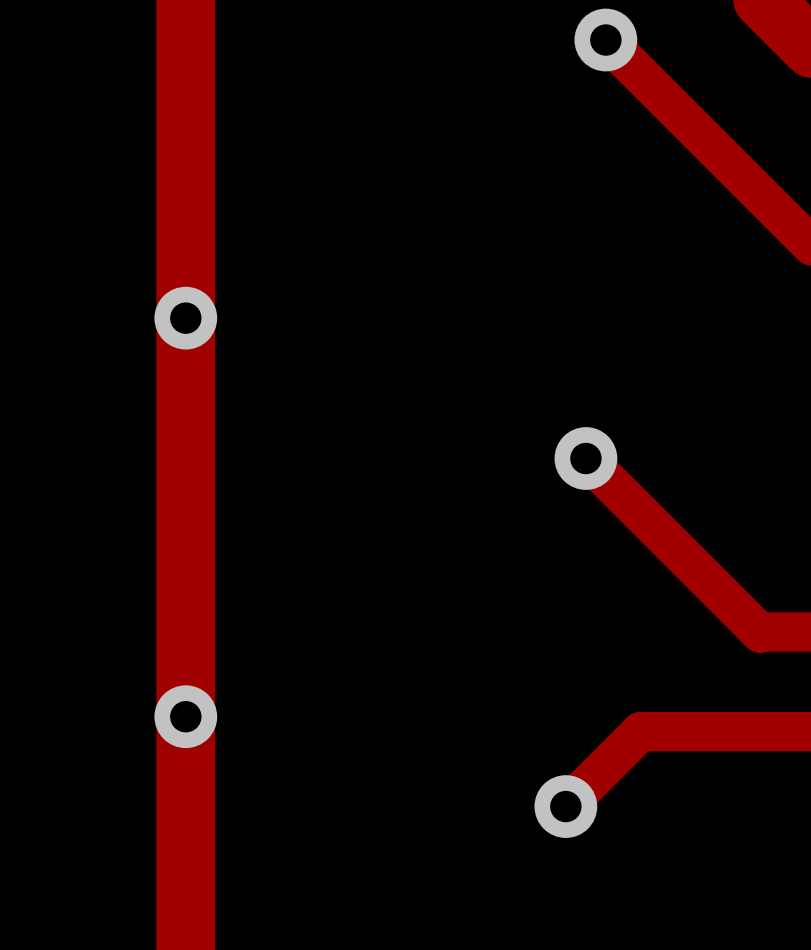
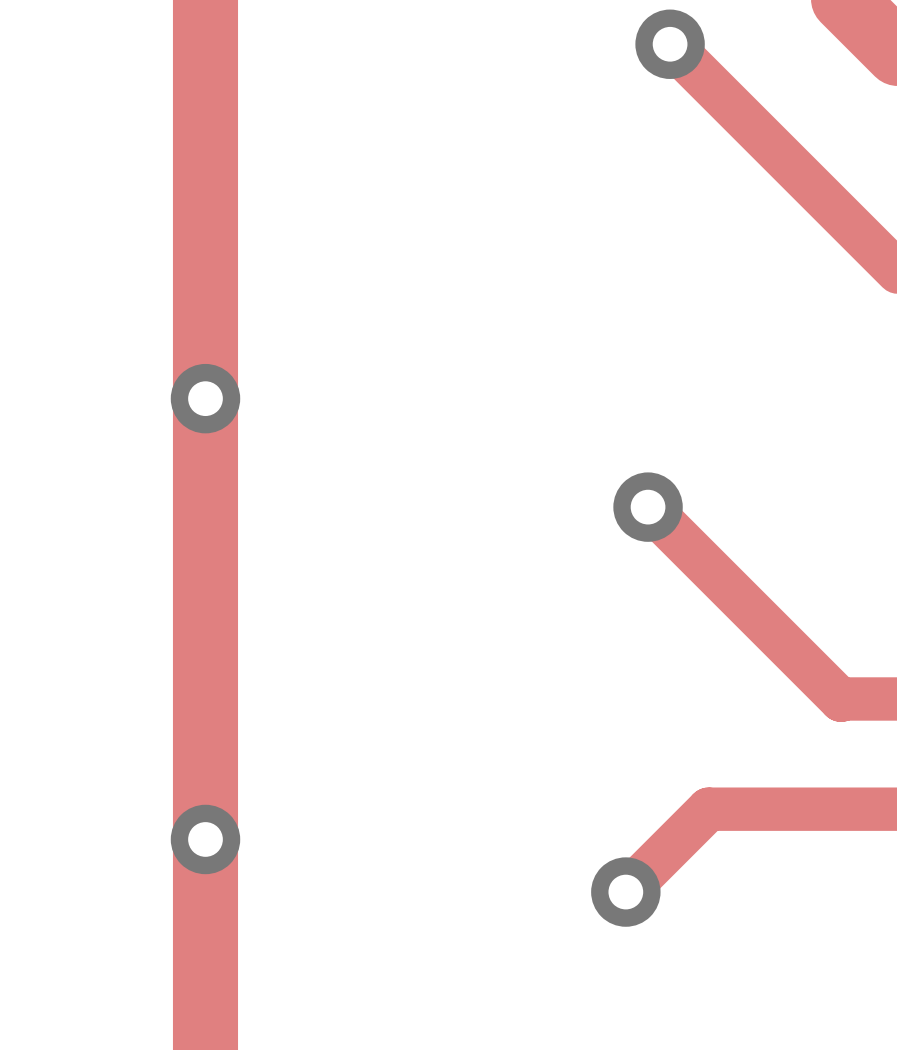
via position: (185, 318) -> (205, 398)
via position: (185, 716) -> (205, 839)

